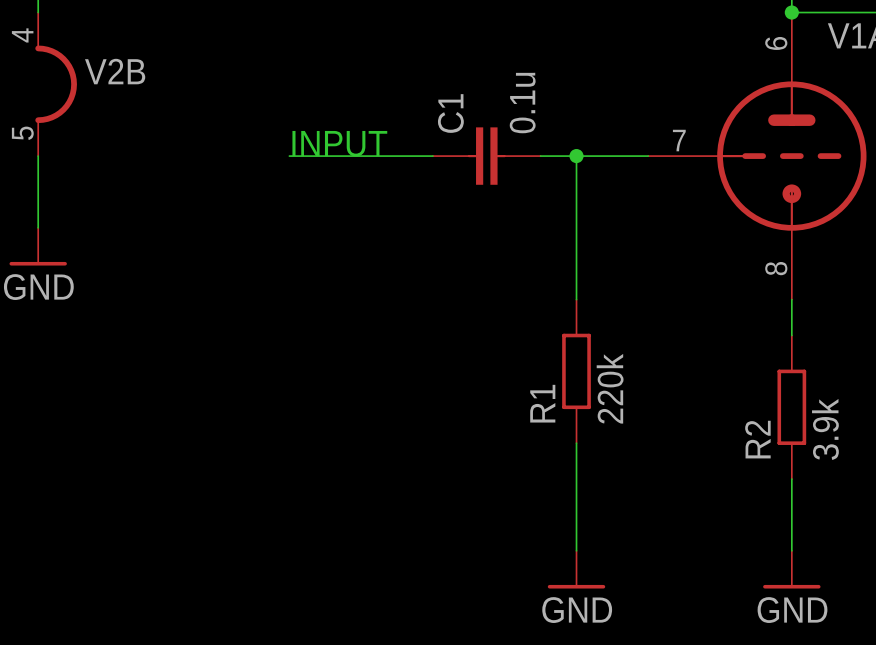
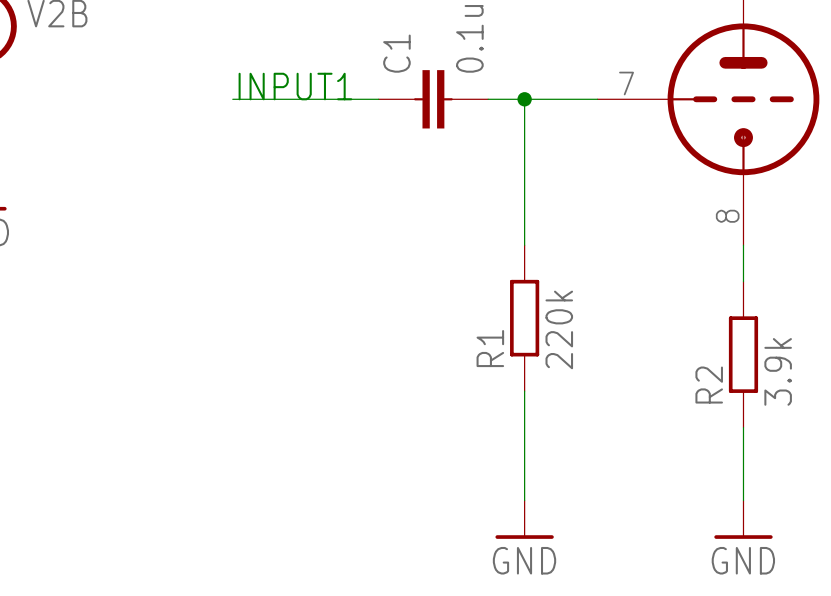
text: INPUT (339, 143) -> INPUT1 (295, 86)

